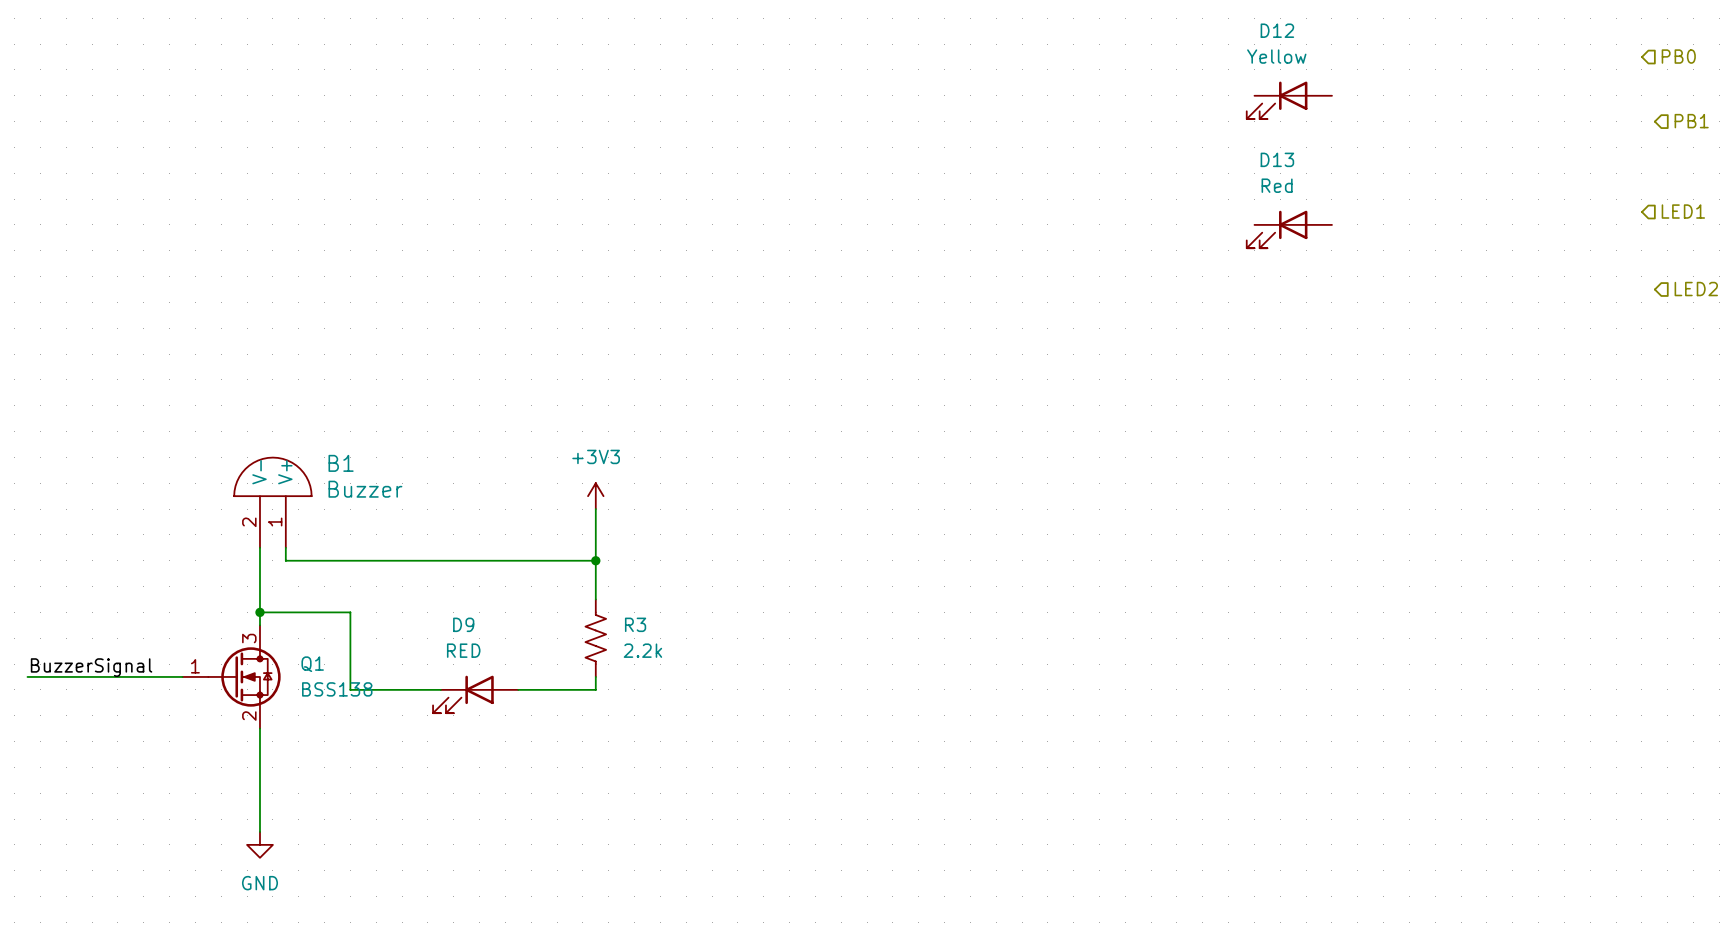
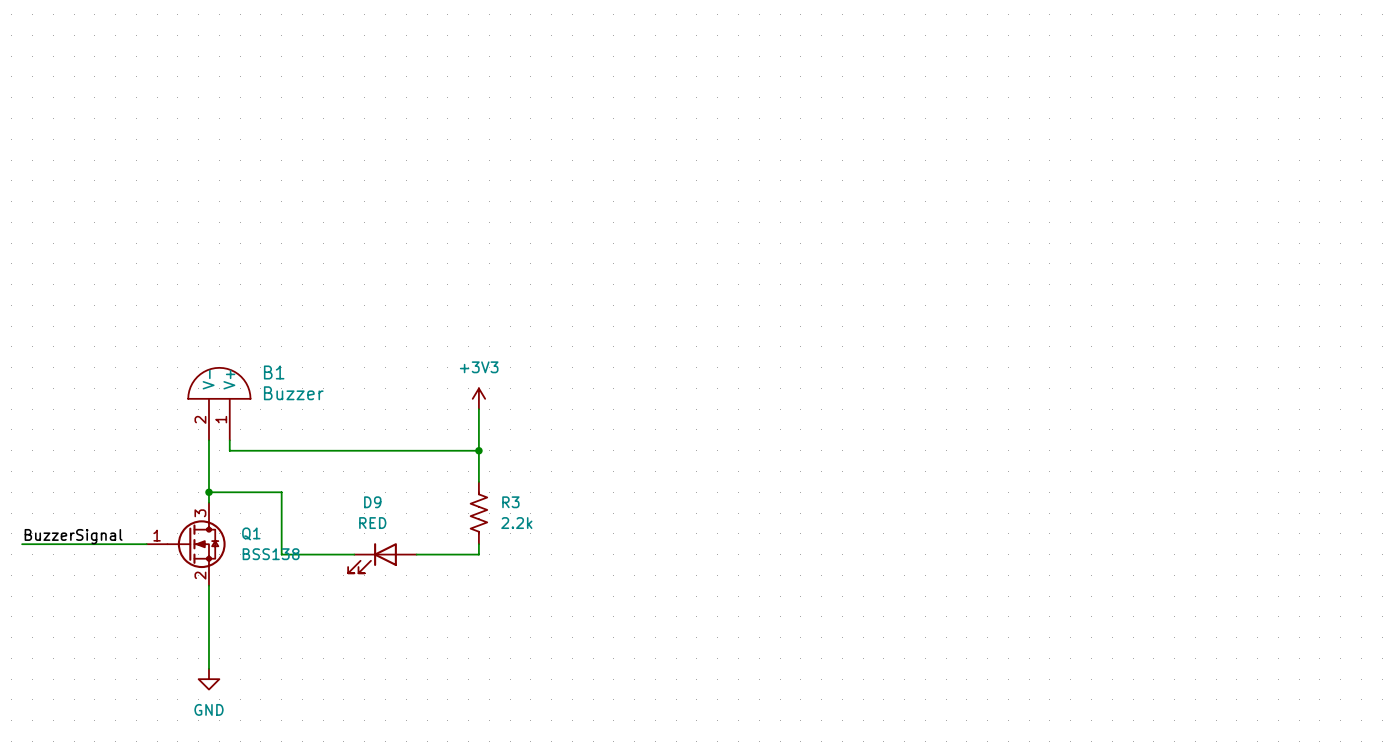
hierarchical label: PB0 (1678, 56) -> none
D12: Yellow (1289, 100) -> none
hierarchical label: PB1 (1691, 121) -> none
hierarchical label: LED1 (1683, 211) -> none
D13: Red (1289, 229) -> none
hierarchical label: LED2 (1696, 289) -> none

